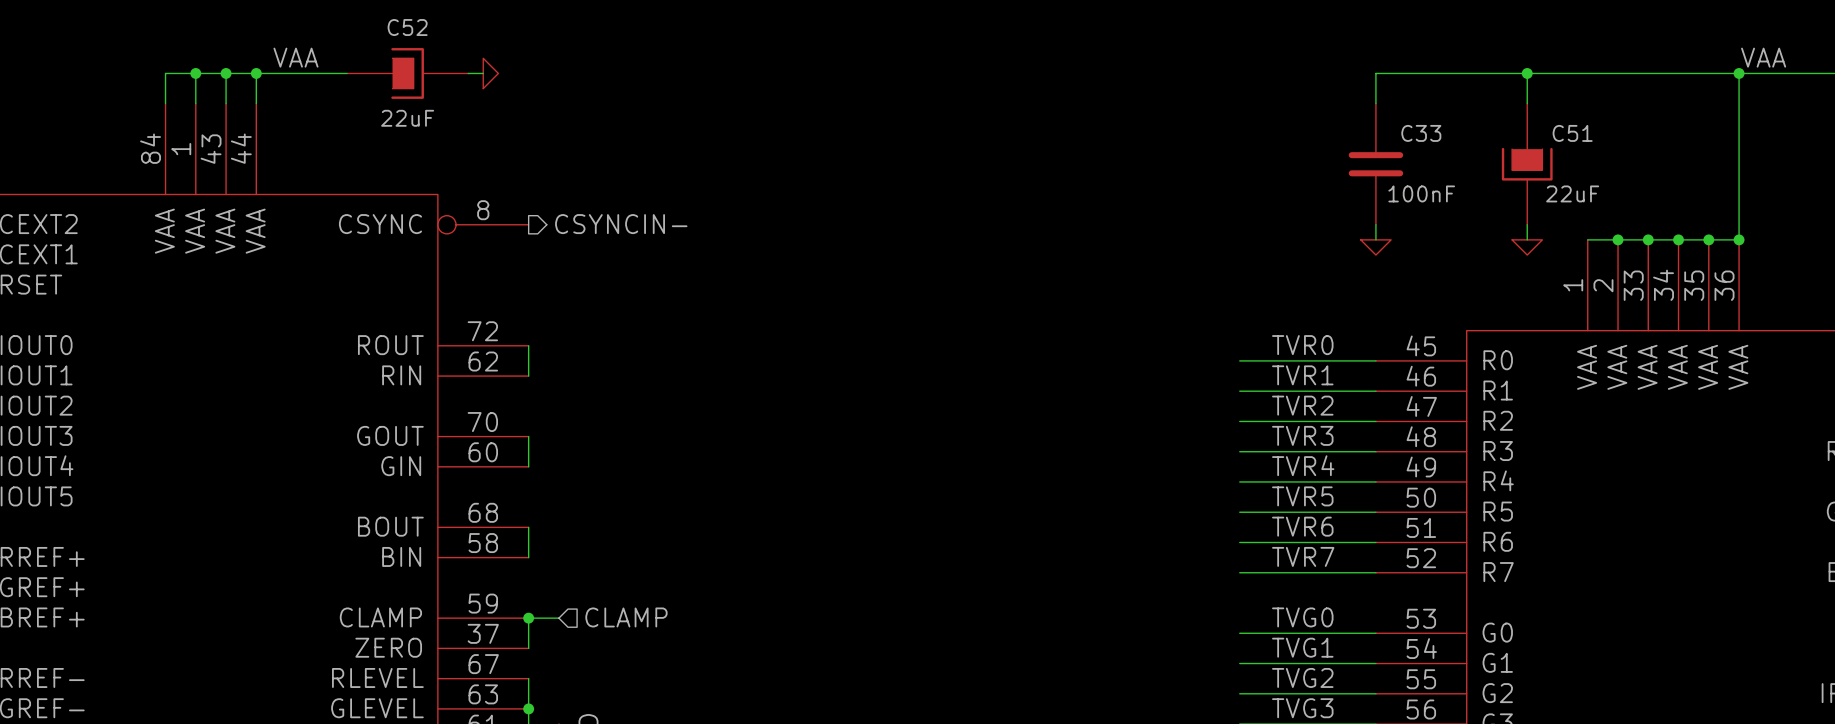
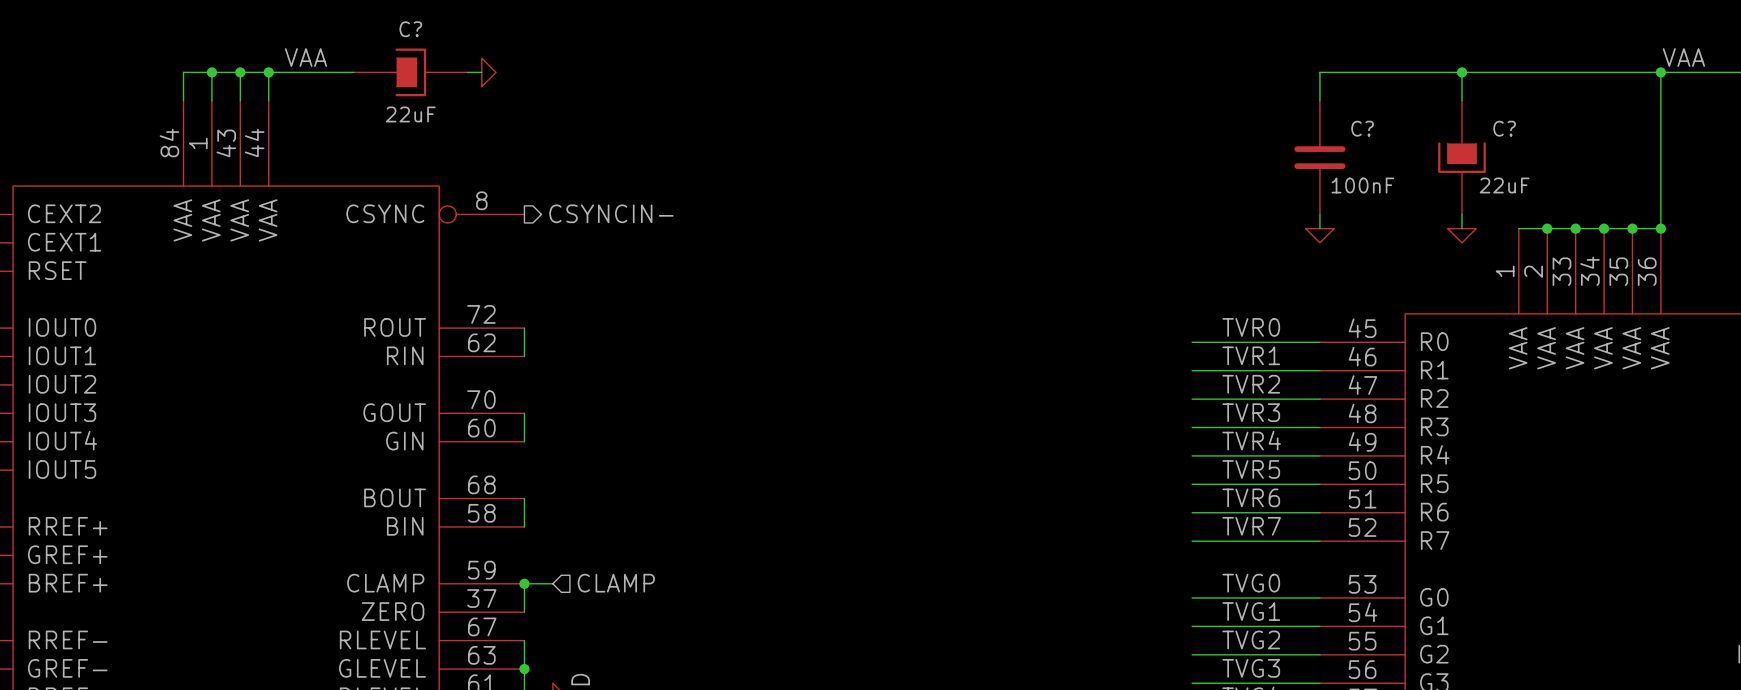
C52 name: C52 (407, 27) -> C? (410, 29)
C33 name: C33 (1421, 133) -> C? (1362, 128)
C51 name: C51 (1572, 133) -> C? (1504, 128)

